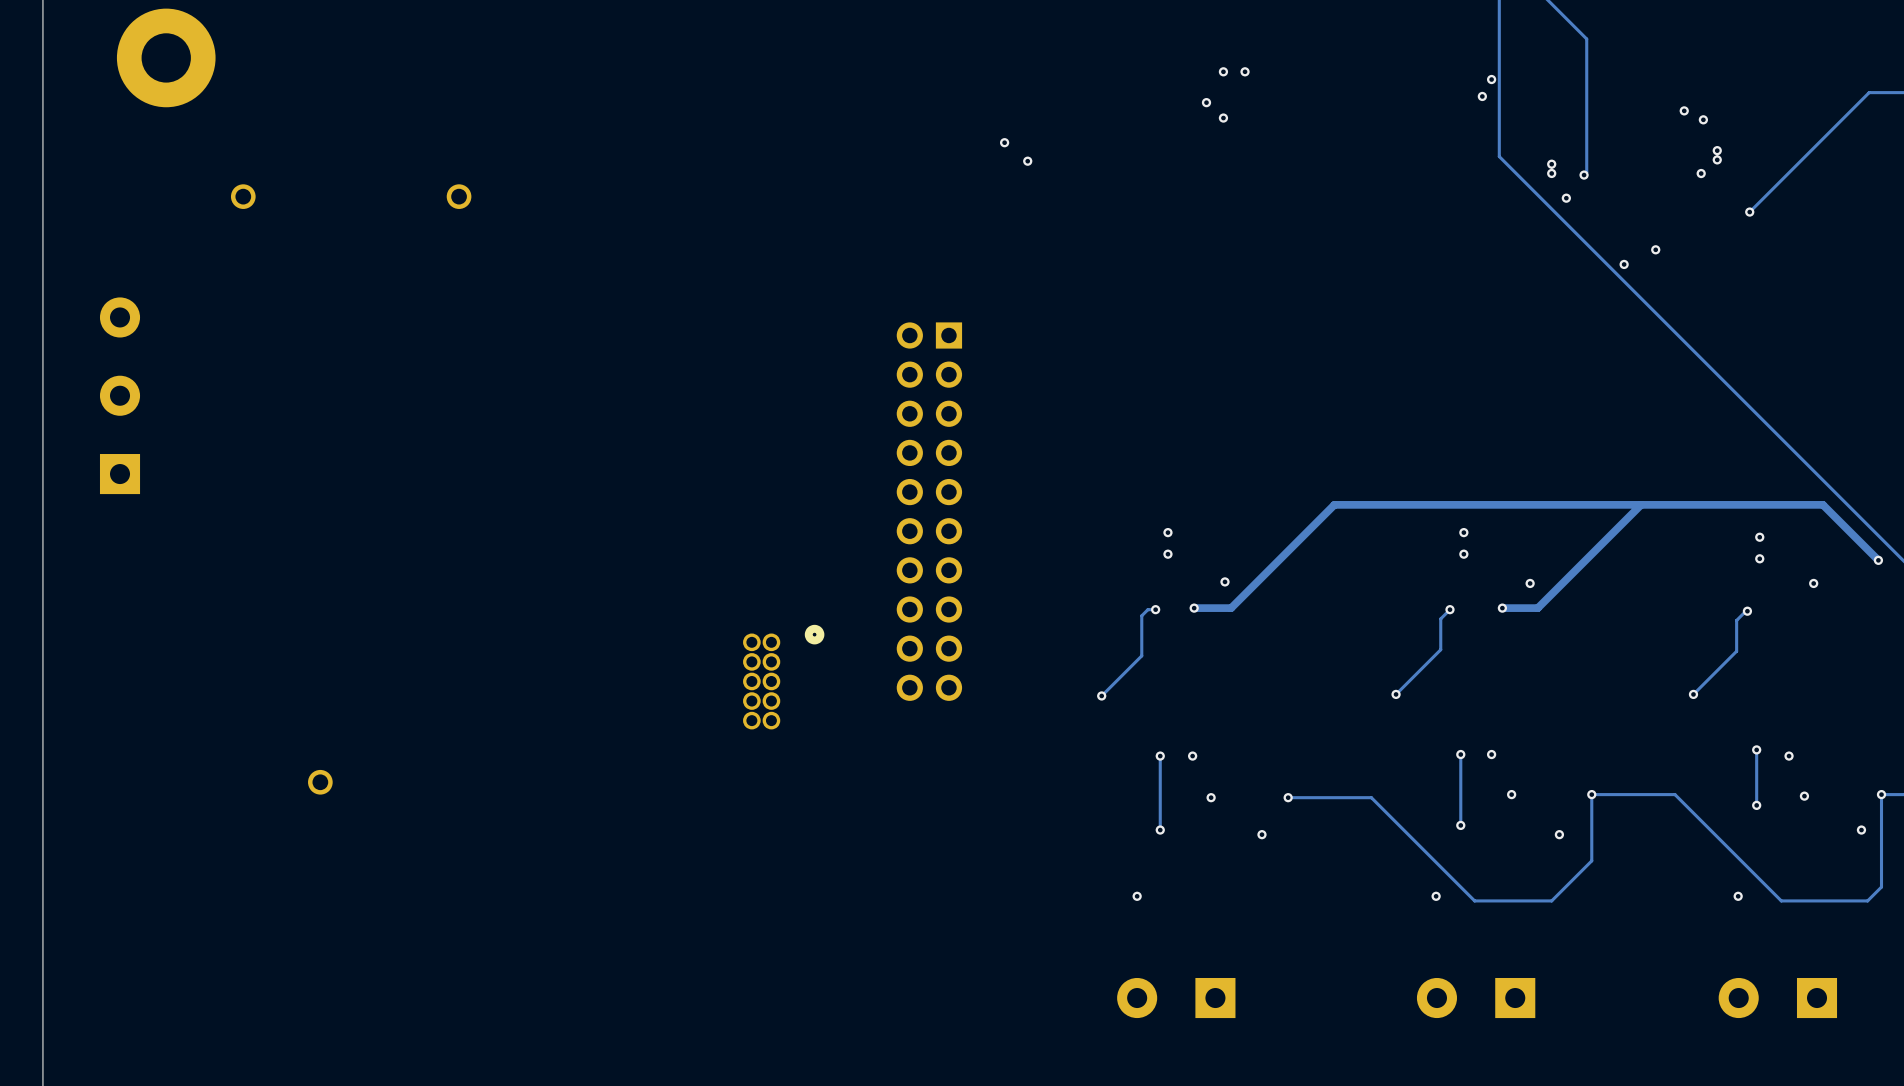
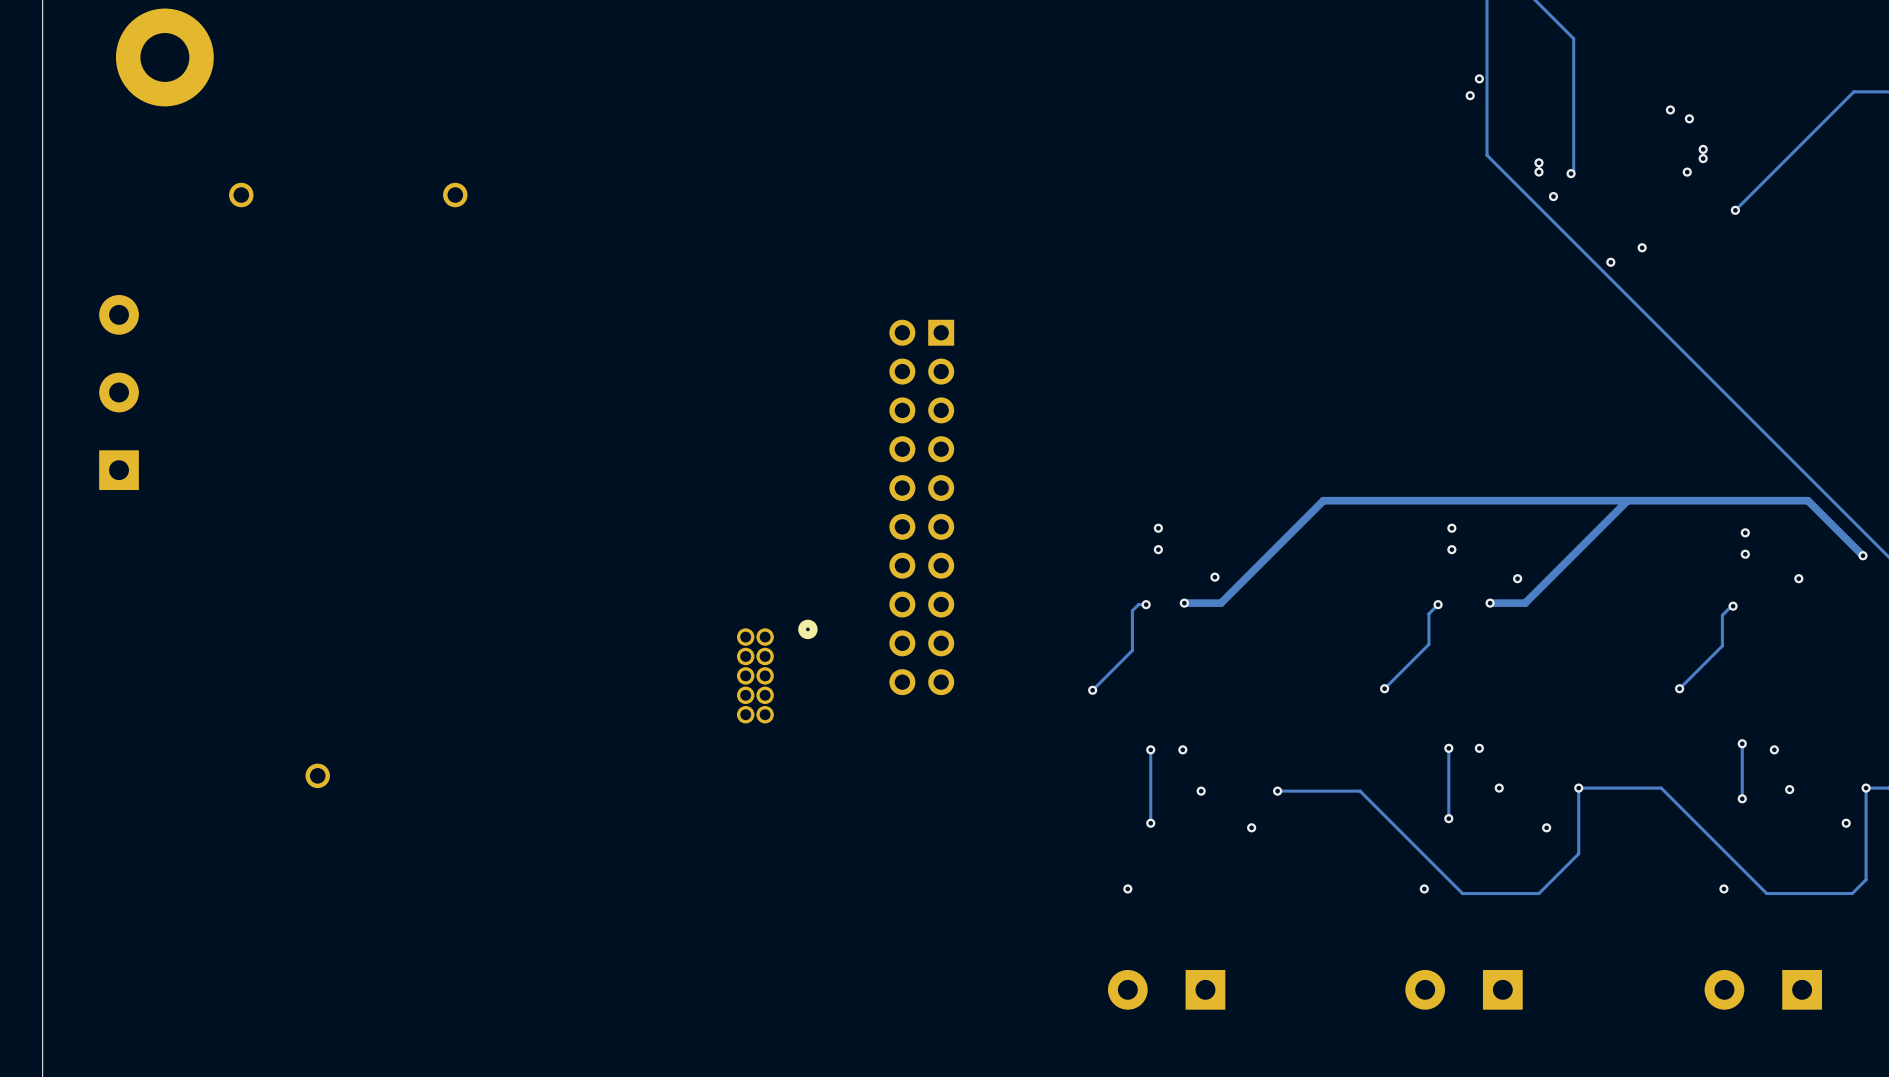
via: (1223, 71) -> none
via: (1245, 71) -> none
via: (1206, 102) -> none
via: (1223, 118) -> none
via: (1004, 142) -> none
via: (1027, 161) -> none

